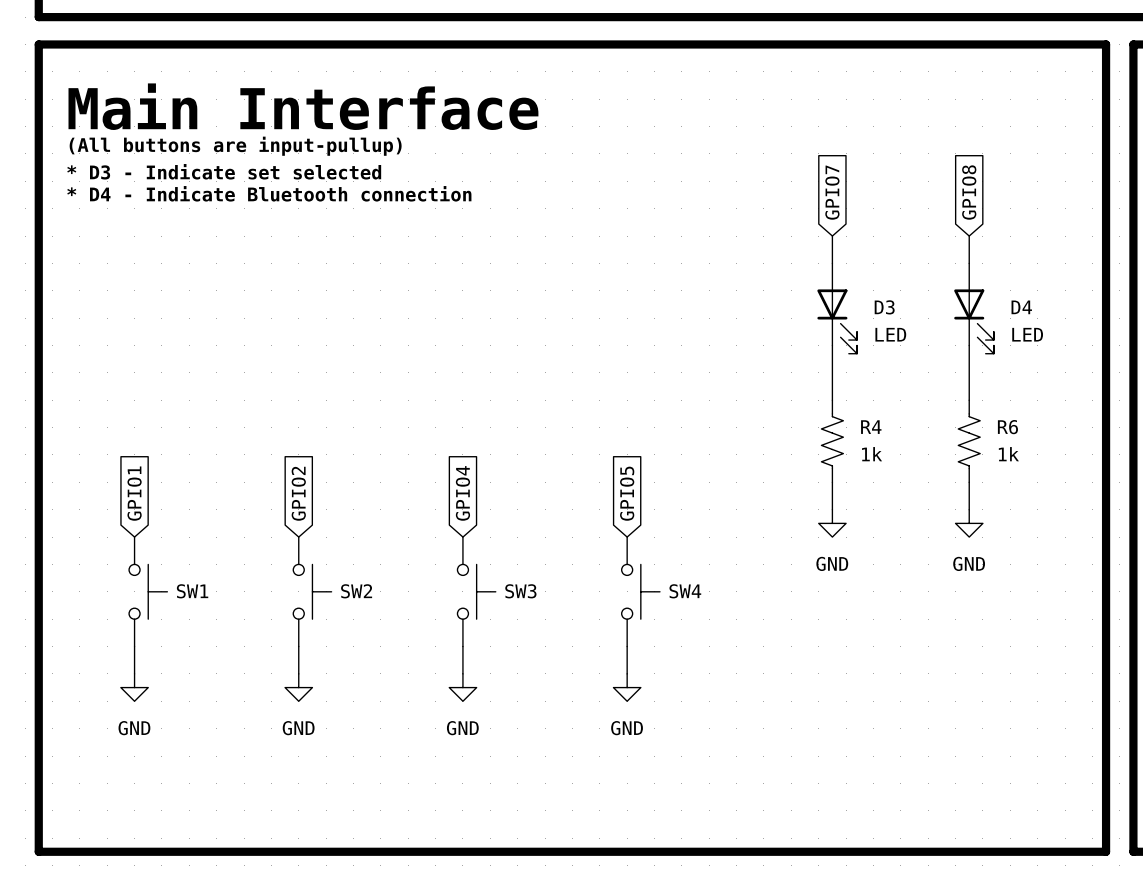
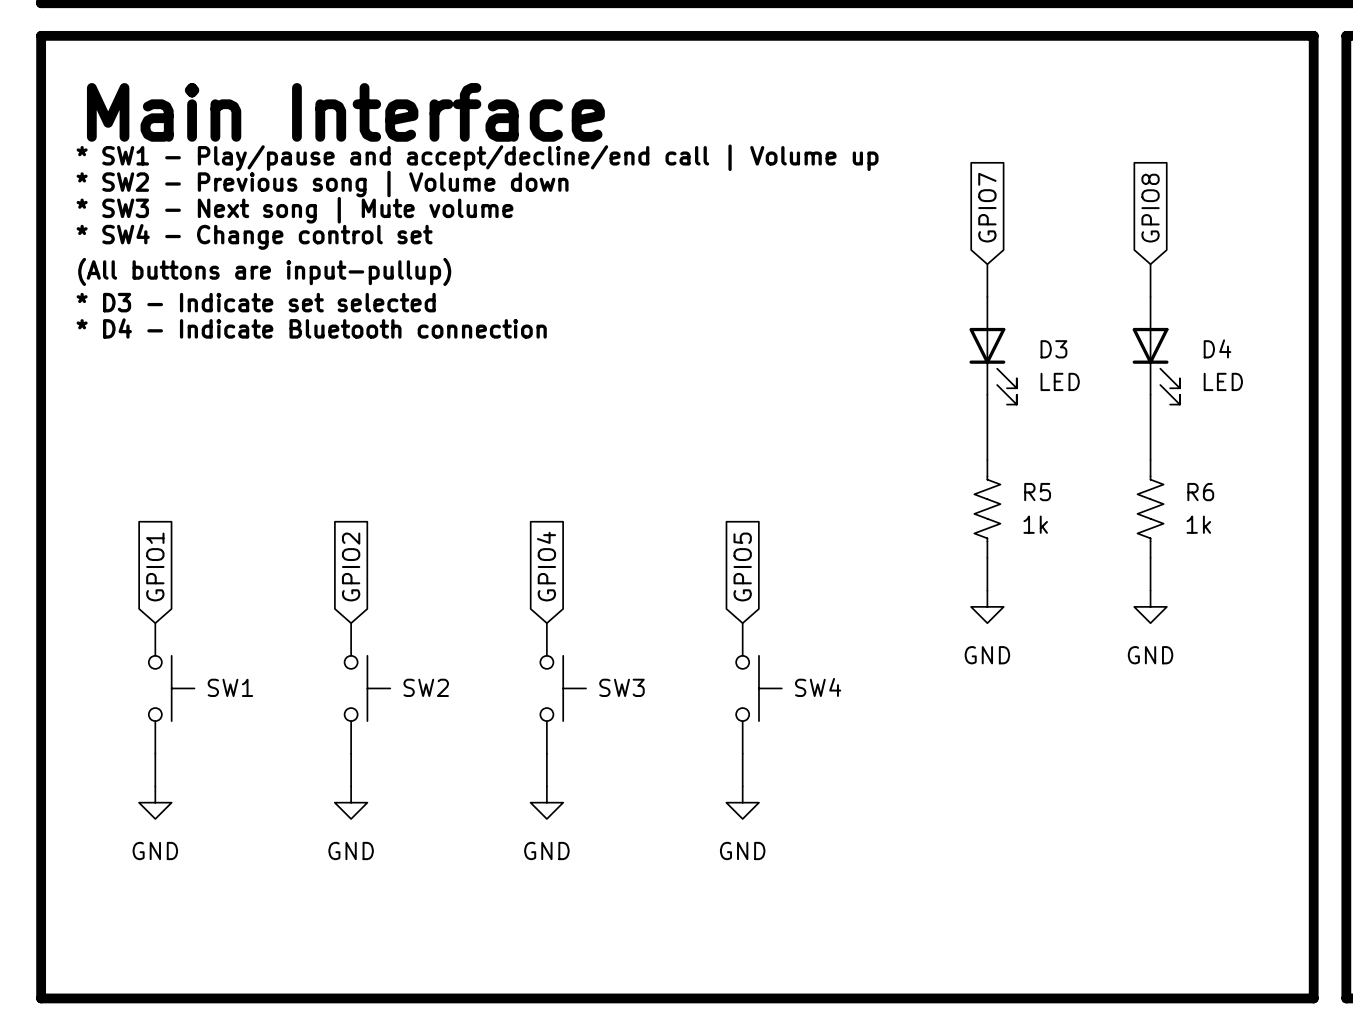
text: (All buttons are input-pullup) (235, 146) -> * SW1 - Play/pause and accept/decline/end call | Volume up (477, 157)
text: * D3 - Indicate set selected (224, 171) -> * SW2 - Previous song | Volume down (322, 183)
text: * D4 - Indicate Bluetooth connection (269, 193) -> * SW3 - Next song | Mute volume (294, 210)
text: none -> * SW4 - Change control set (254, 236)
text: none -> (All buttons are input-pullup) (264, 271)
text: none -> * D3 - Indicate set selected (256, 302)
text: none -> * D4 - Indicate Bluetooth connection (311, 328)
R4 name: R4 (871, 427) -> R5 (1037, 492)

